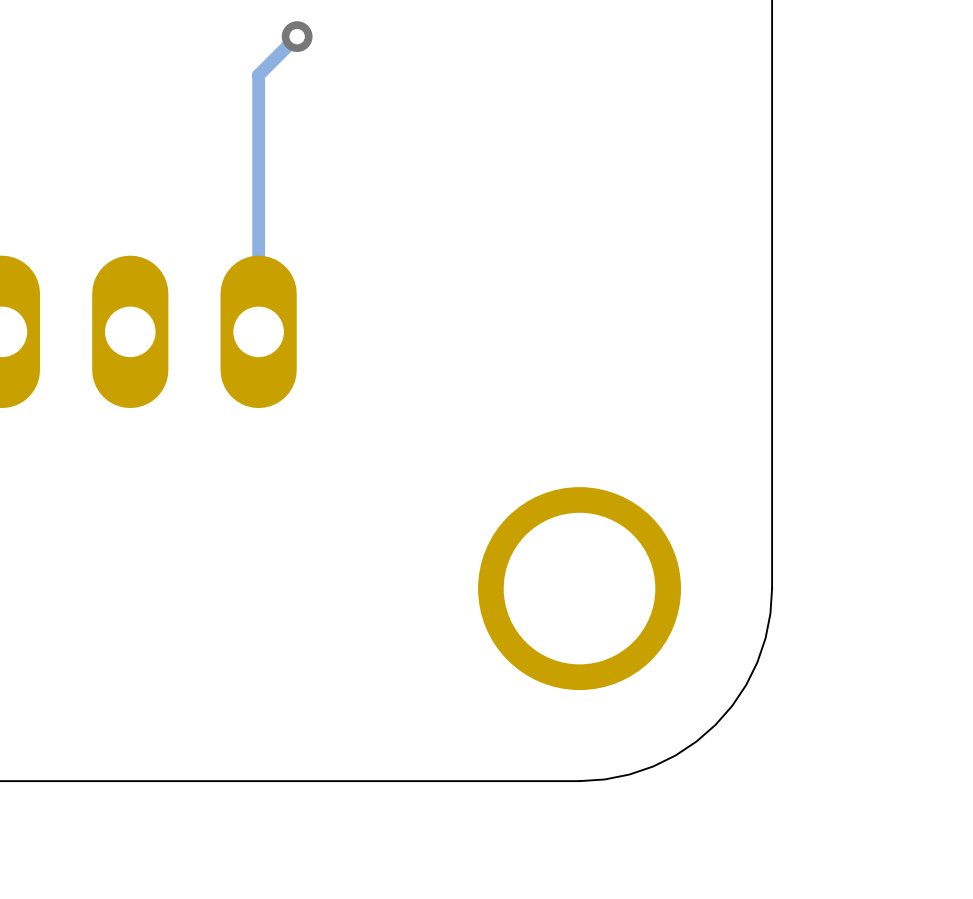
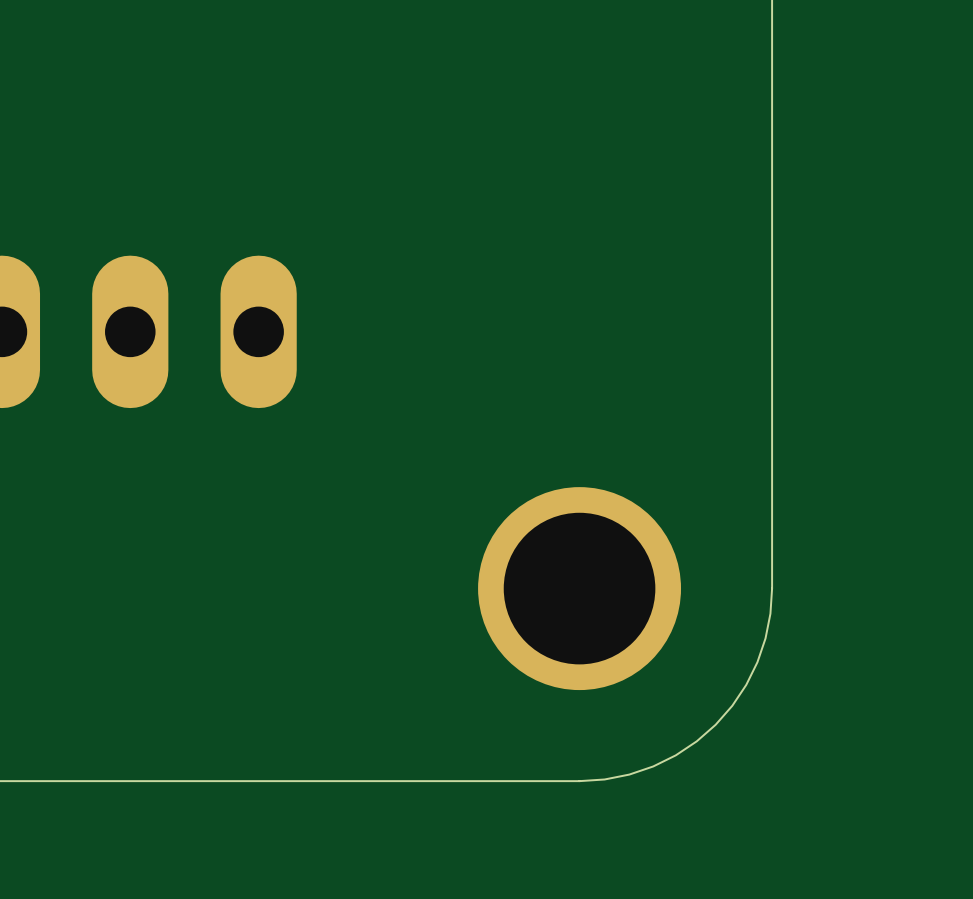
track: (297, 36) (258, 75) (258, 331) -> none
via: (297, 36) -> none

